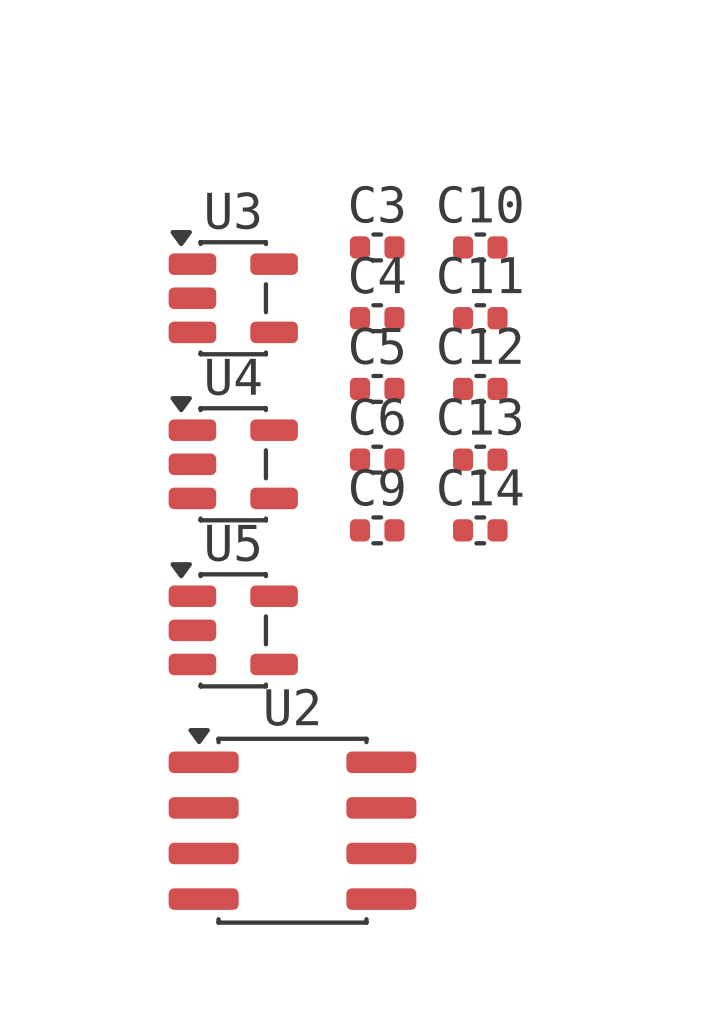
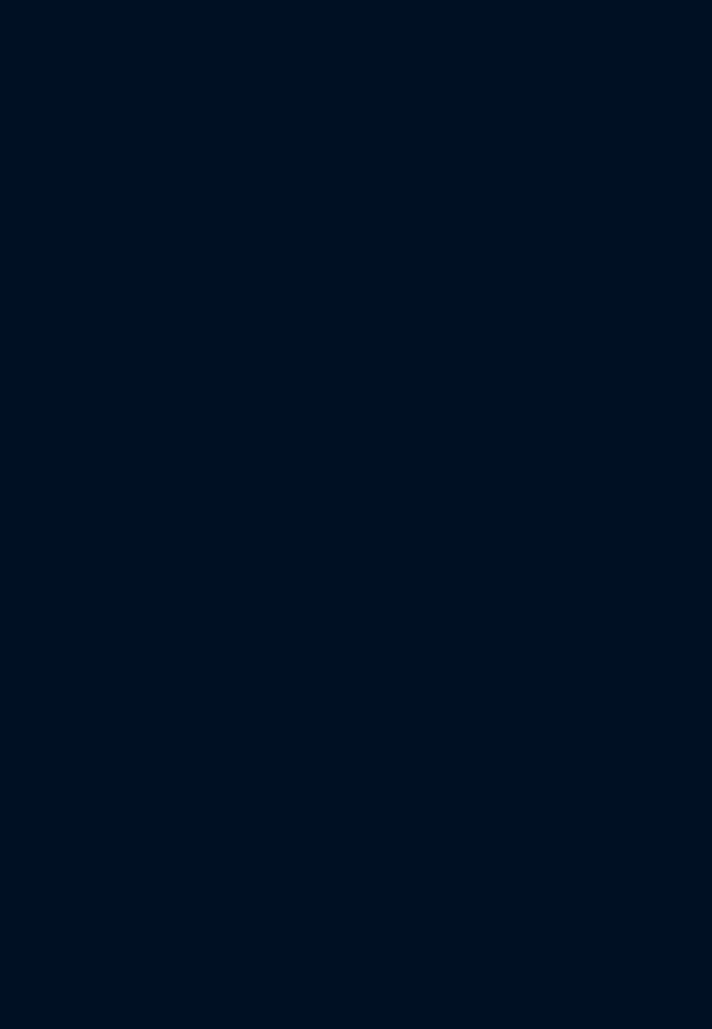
C3: (377, 247) -> none
C10: (480, 247) -> none
U3: (233, 293) -> none
C4: (377, 318) -> none
C11: (480, 318) -> none
C5: (377, 388) -> none
C12: (480, 388) -> none
U4: (233, 459) -> none
C6: (377, 459) -> none
C13: (480, 459) -> none
C9: (377, 530) -> none
C14: (480, 530) -> none
U5: (233, 625) -> none
U2: (292, 826) -> none

